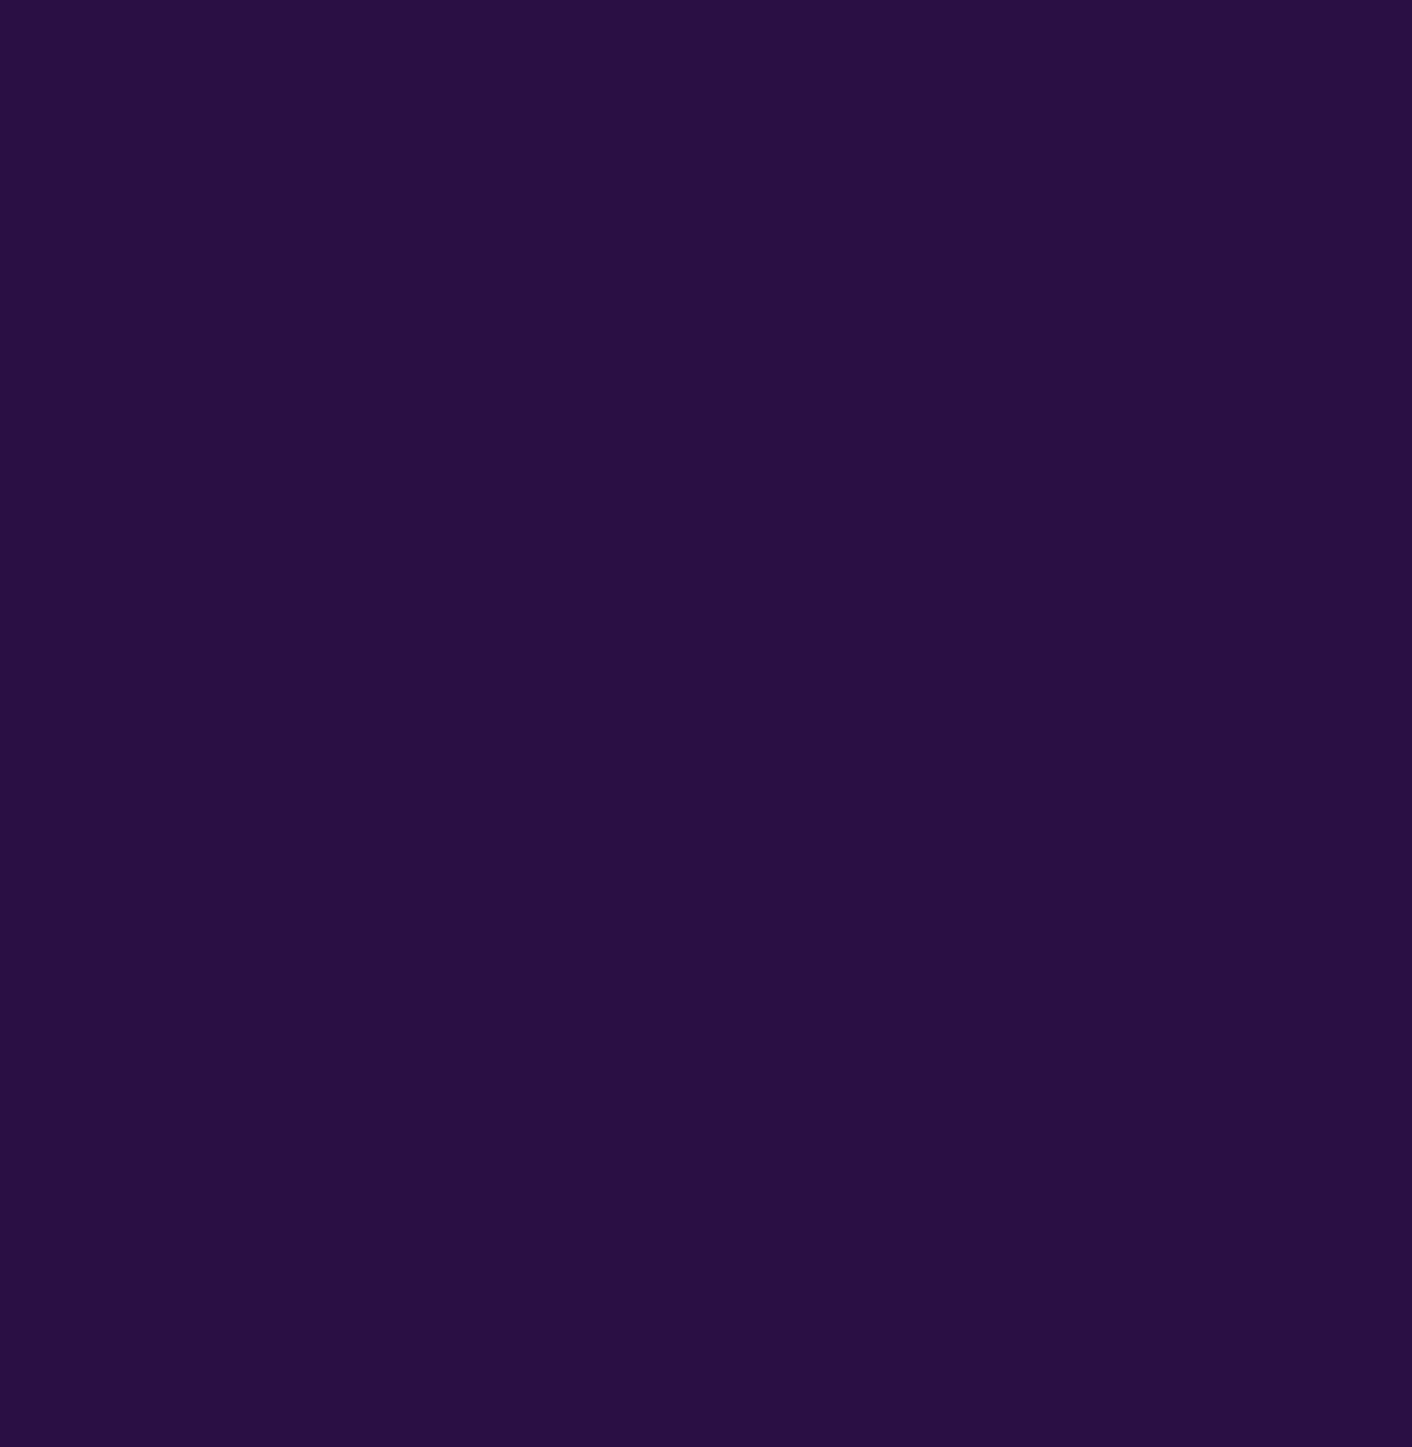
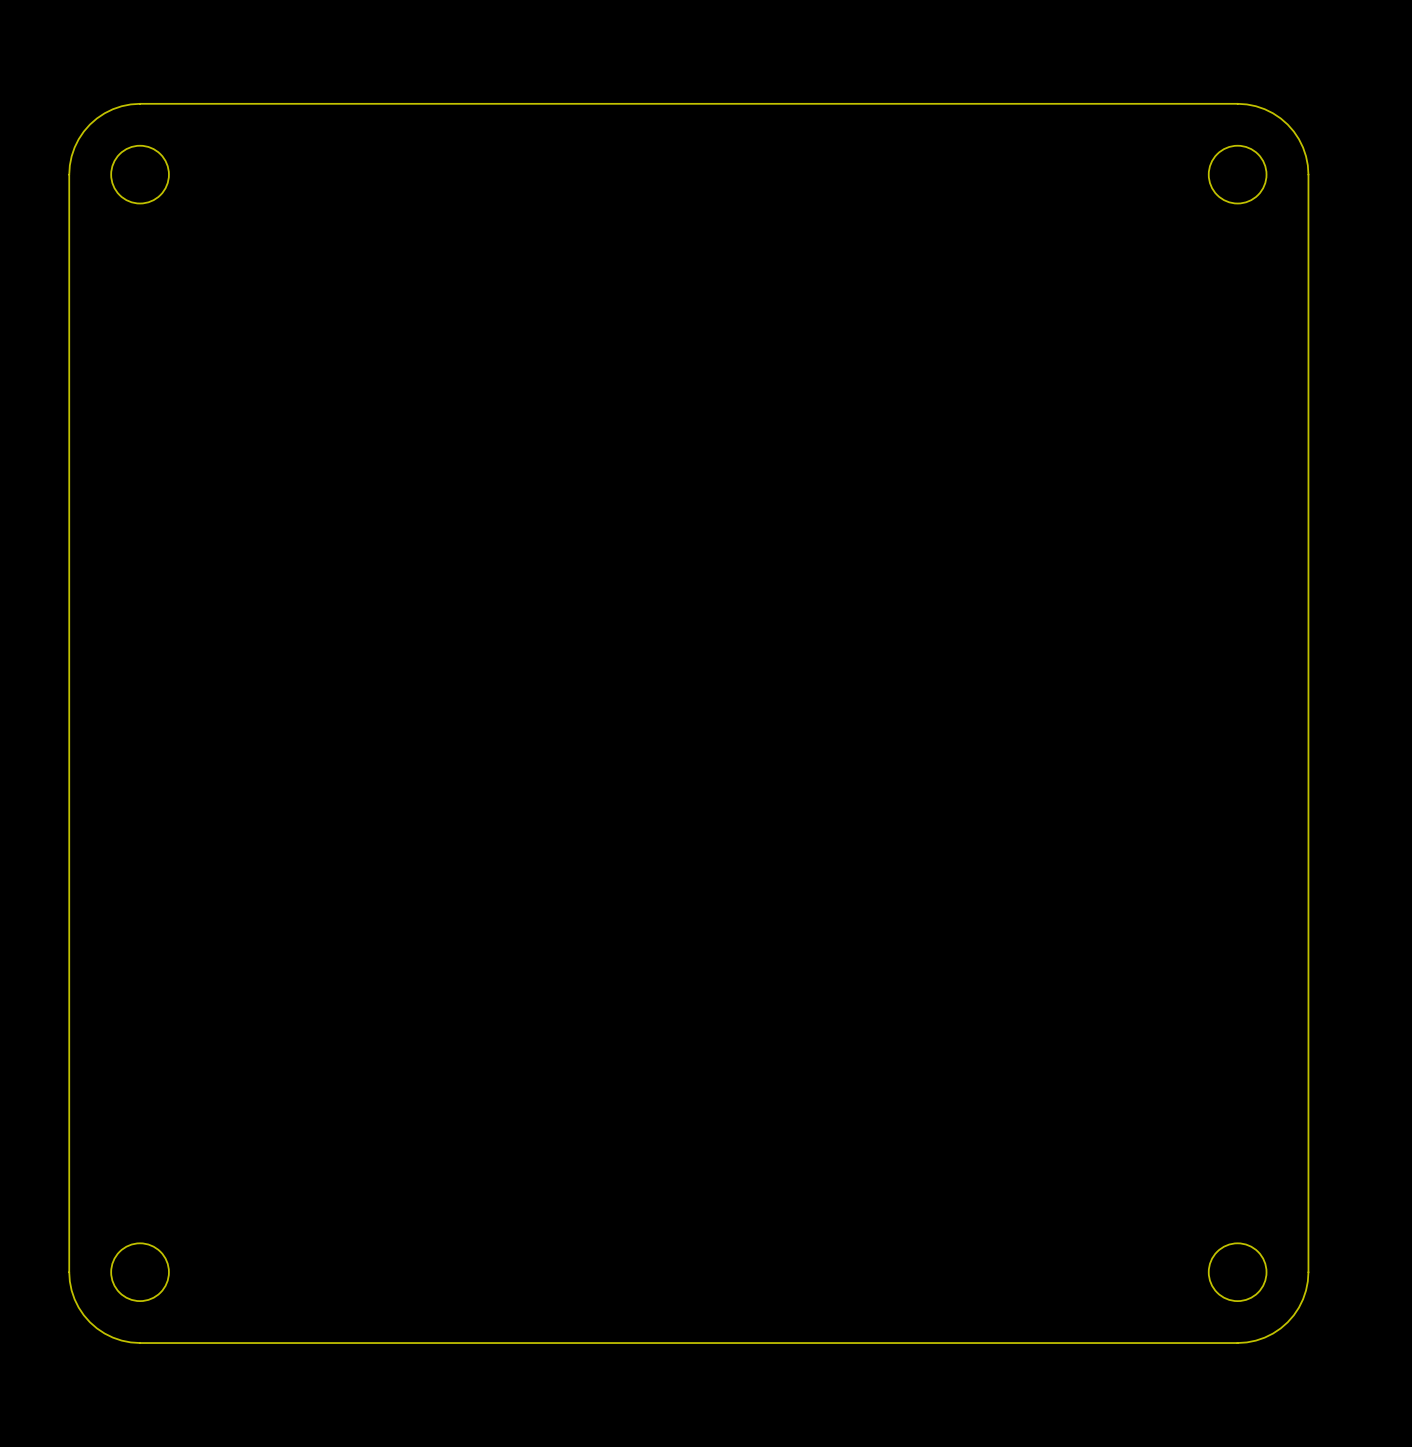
board edge: none -> (140, 103) (1237, 103) (1264, 109) (1287, 124) (1303, 147) (1308, 174) (1308, 1272) (1303, 1299) (1287, 1322) (1264, 1337) (1237, 1343) (140, 1343) (112, 1337) (89, 1322) (74, 1299) (69, 1272) (69, 174) (74, 147) (89, 124) (112, 109) (140, 103)
round board edge: none -> [110, 144, 170, 205]
round board edge: none -> [1207, 144, 1268, 205]
round board edge: none -> [110, 1242, 170, 1302]
round board edge: none -> [1207, 1242, 1268, 1302]

